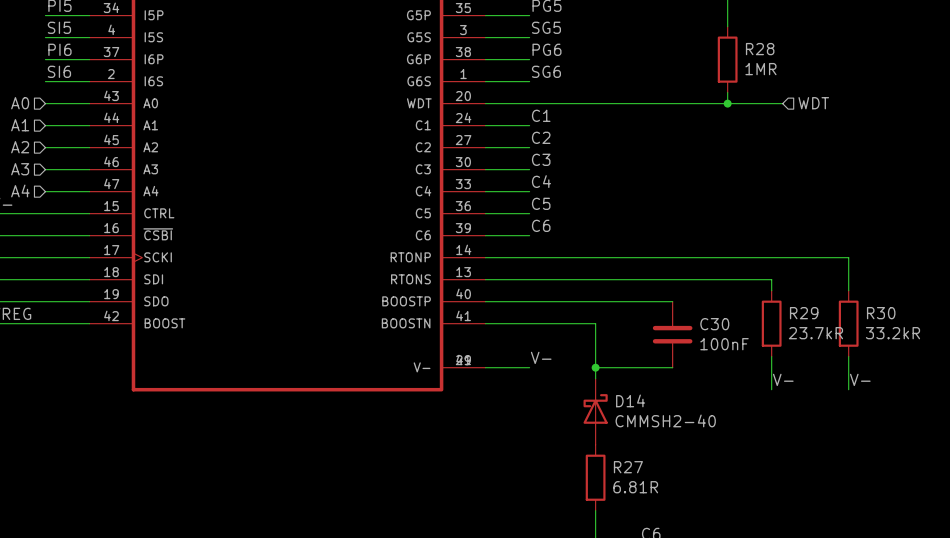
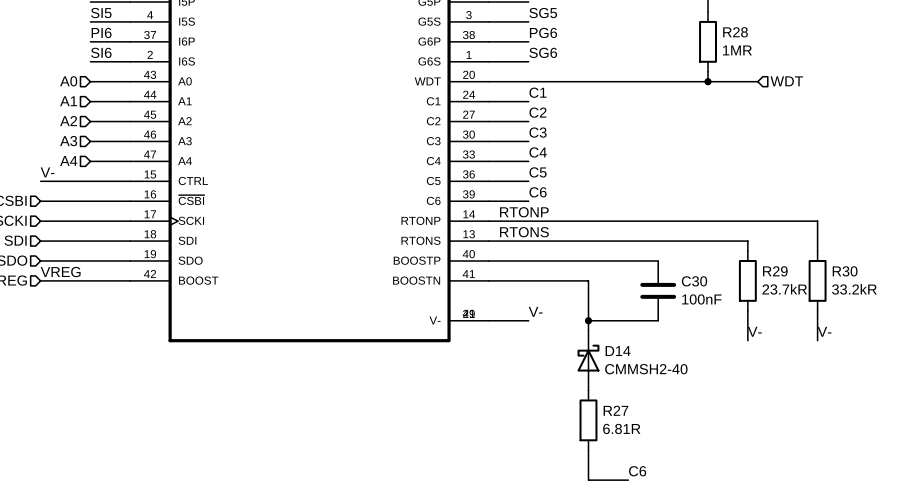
label: none -> RTONP (524, 212)
label: none -> RTONS (524, 232)

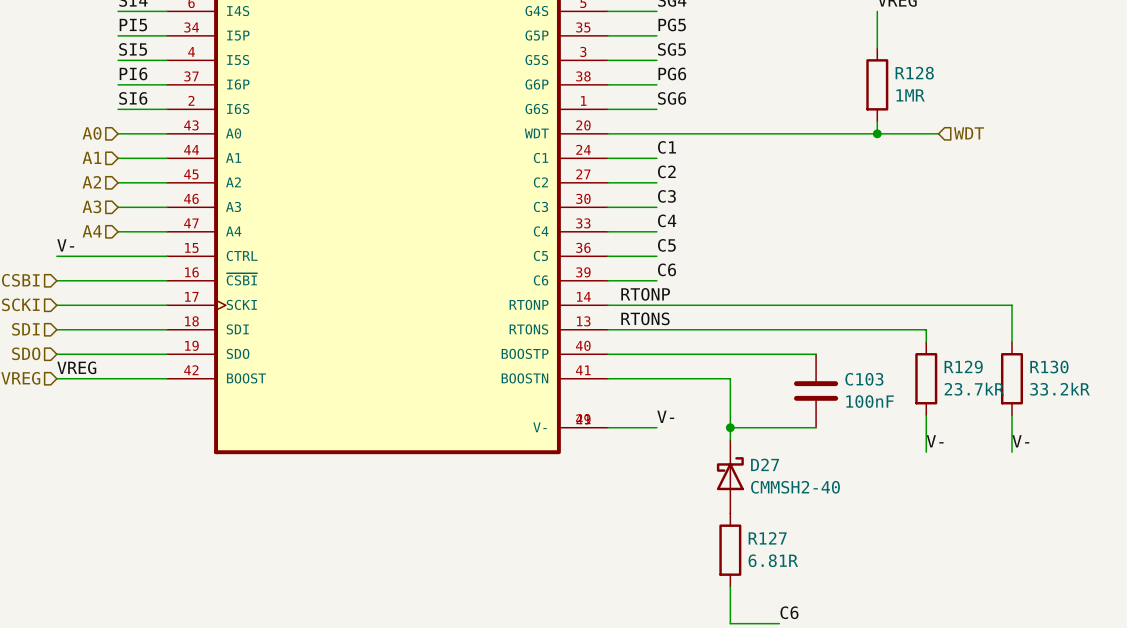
R28 name: R28 (735, 32) -> R128 (914, 73)
R29 name: R29 (775, 271) -> R129 (963, 367)
R30 name: R30 (845, 271) -> R130 (1049, 367)
C30 name: C30 (694, 281) -> C103 (864, 379)
D14 name: D14 (618, 351) -> D27 (765, 464)
R27 name: R27 (615, 410) -> R127 (767, 538)

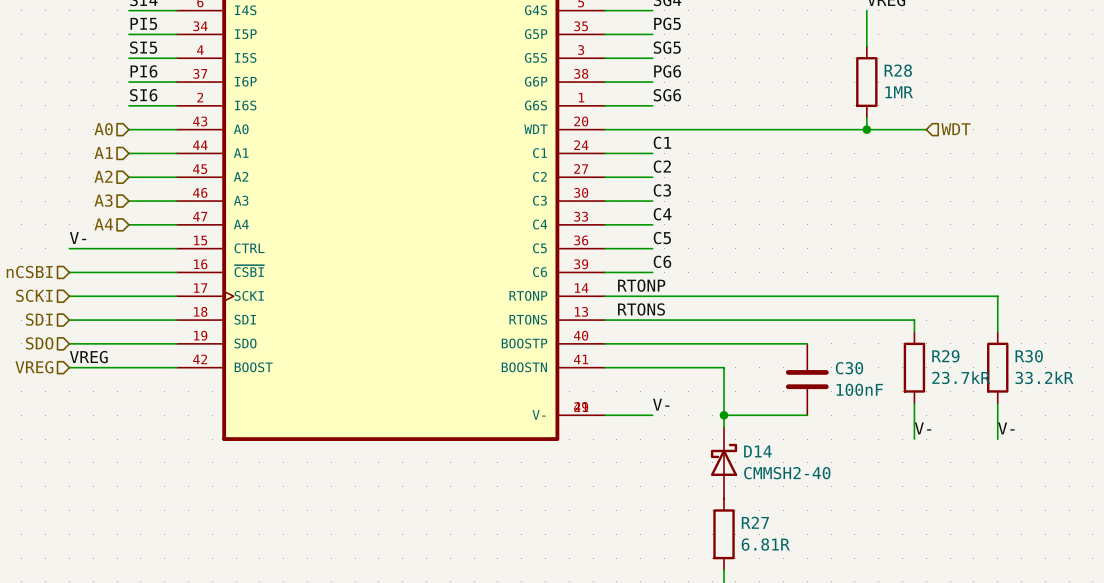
R128 name: R128 (914, 73) -> R28 (898, 70)
R129 name: R129 (963, 367) -> R29 (945, 356)
R130 name: R130 (1049, 367) -> R30 (1029, 356)
C103 name: C103 (864, 379) -> C30 (849, 368)
D27 name: D27 (765, 464) -> D14 (757, 451)
R127 name: R127 (767, 538) -> R27 (755, 522)

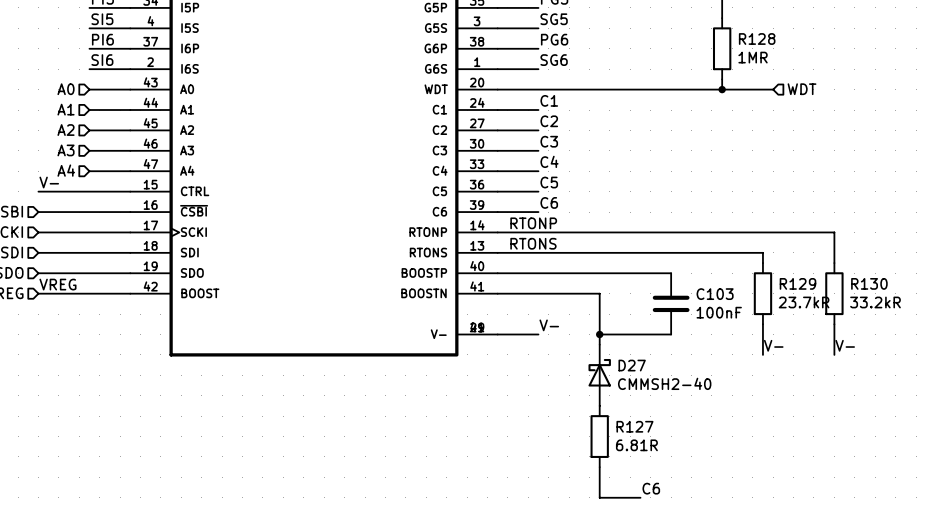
R28 name: R28 (898, 70) -> R128 (757, 39)
R29 name: R29 (945, 356) -> R129 (797, 283)
R30 name: R30 (1029, 356) -> R130 (869, 283)
C30 name: C30 (849, 368) -> C103 (715, 294)
D14 name: D14 (757, 451) -> D27 (632, 365)
R27 name: R27 (755, 522) -> R127 (634, 426)

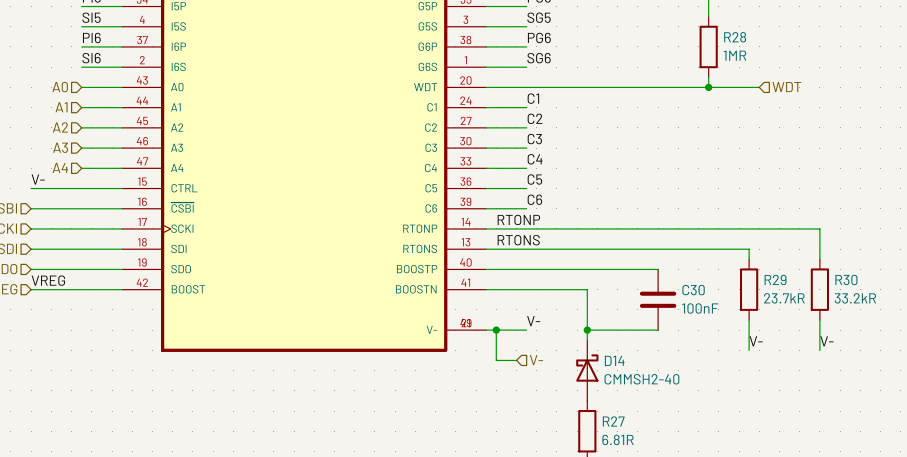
R128 name: R128 (757, 39) -> R28 (735, 37)
R129 name: R129 (797, 283) -> R29 (775, 279)
R130 name: R130 (869, 283) -> R30 (846, 279)
C103 name: C103 (715, 294) -> C30 (693, 290)
wire: none -> (496, 330) (496, 360) (516, 360)
junction: none -> (496, 330)
hierarchical label: none -> V- (536, 360)
D27 name: D27 (632, 365) -> D14 (614, 360)
R127 name: R127 (634, 426) -> R27 (613, 421)

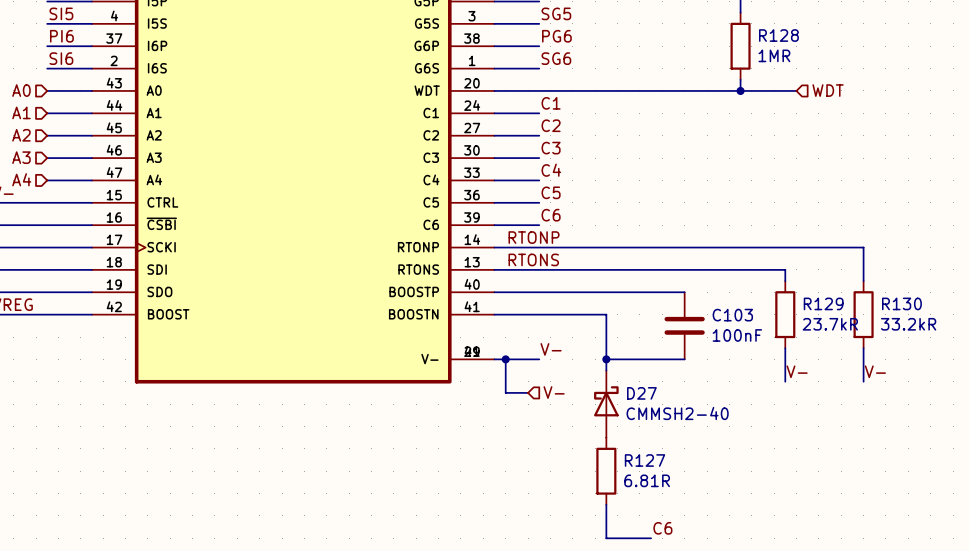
R28 name: R28 (735, 37) -> R128 (778, 35)
R29 name: R29 (775, 279) -> R129 (823, 303)
R30 name: R30 (846, 279) -> R130 (901, 303)
C30 name: C30 (693, 290) -> C103 (732, 315)
D14 name: D14 (614, 360) -> D27 (641, 393)
R27 name: R27 (613, 421) -> R127 (645, 460)

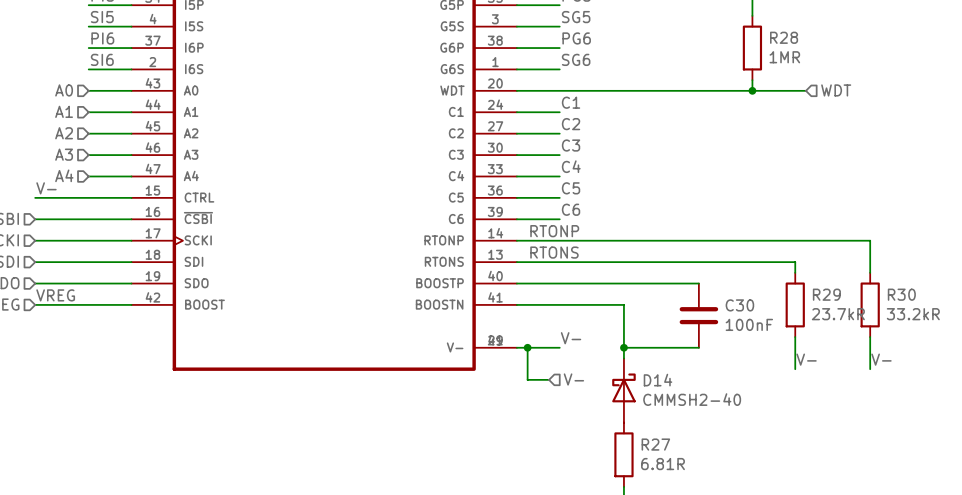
R128 name: R128 (778, 35) -> R28 (784, 37)
R129 name: R129 (823, 303) -> R29 (826, 294)
R130 name: R130 (901, 303) -> R30 (901, 294)
C103 name: C103 (732, 315) -> C30 (739, 305)
D27 name: D27 (641, 393) -> D14 (658, 380)
R127 name: R127 (645, 460) -> R27 (655, 444)

